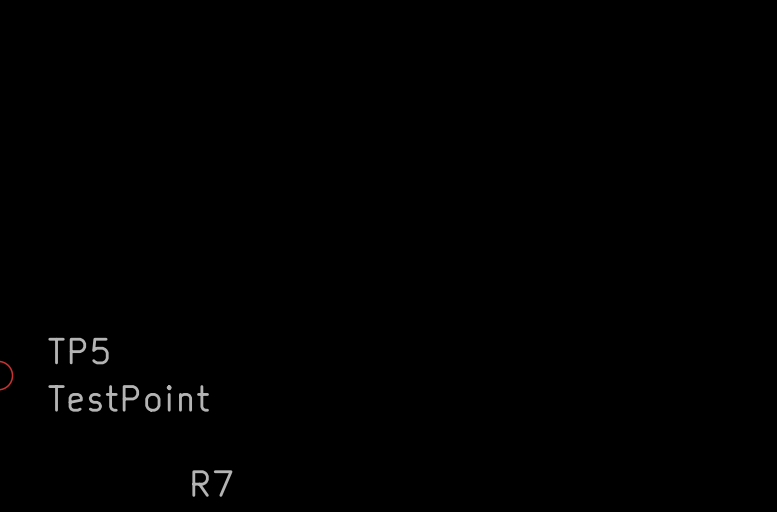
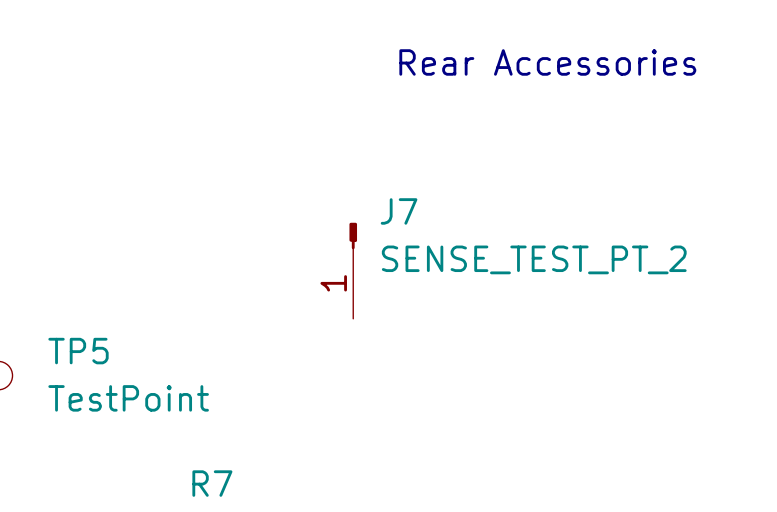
text: none -> Rear Accessories (547, 62)
J7: none -> SENSE_TEST_PT_2 (353, 270)

